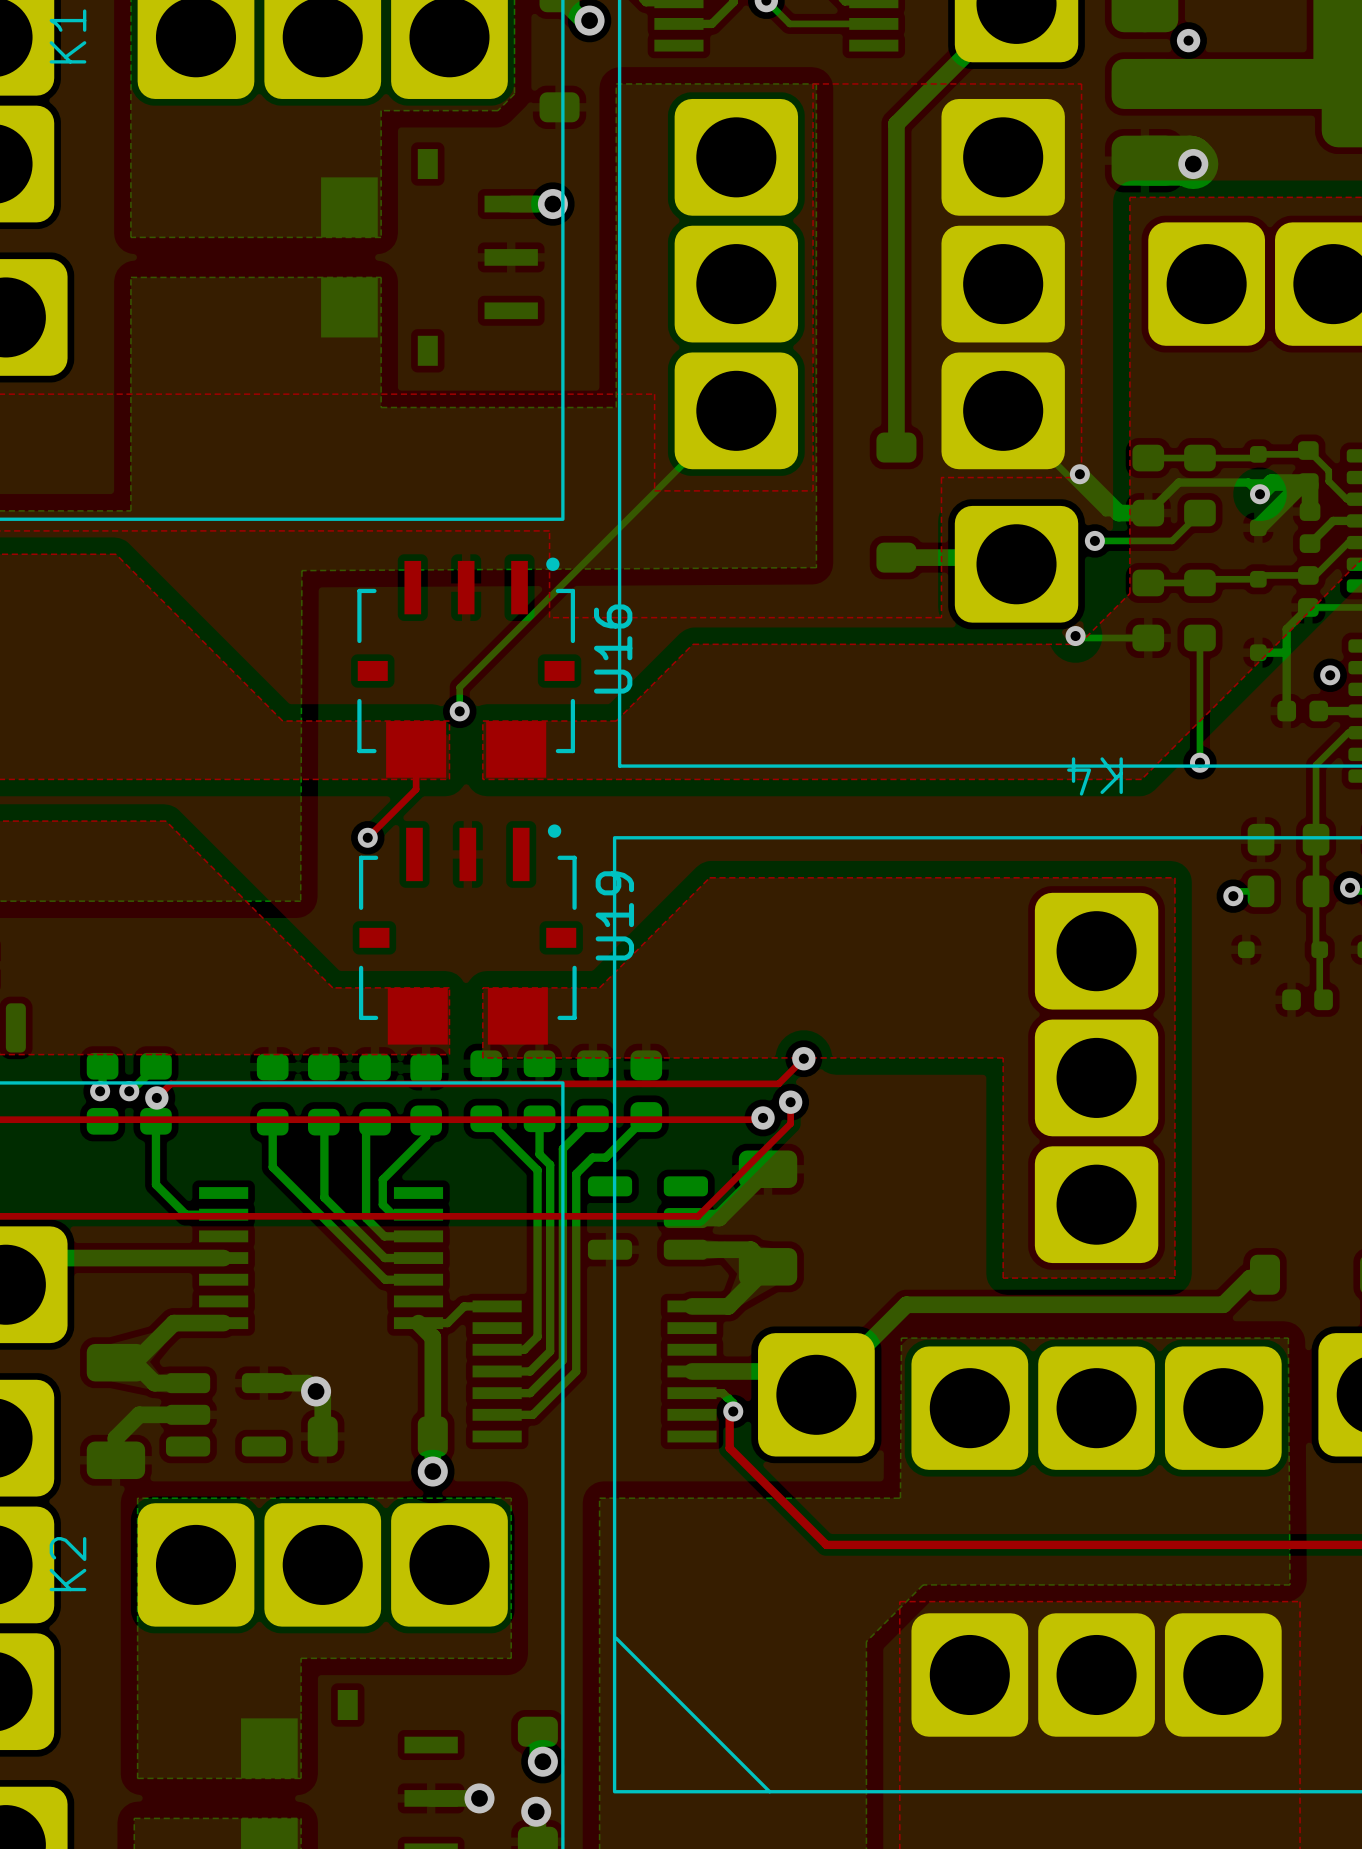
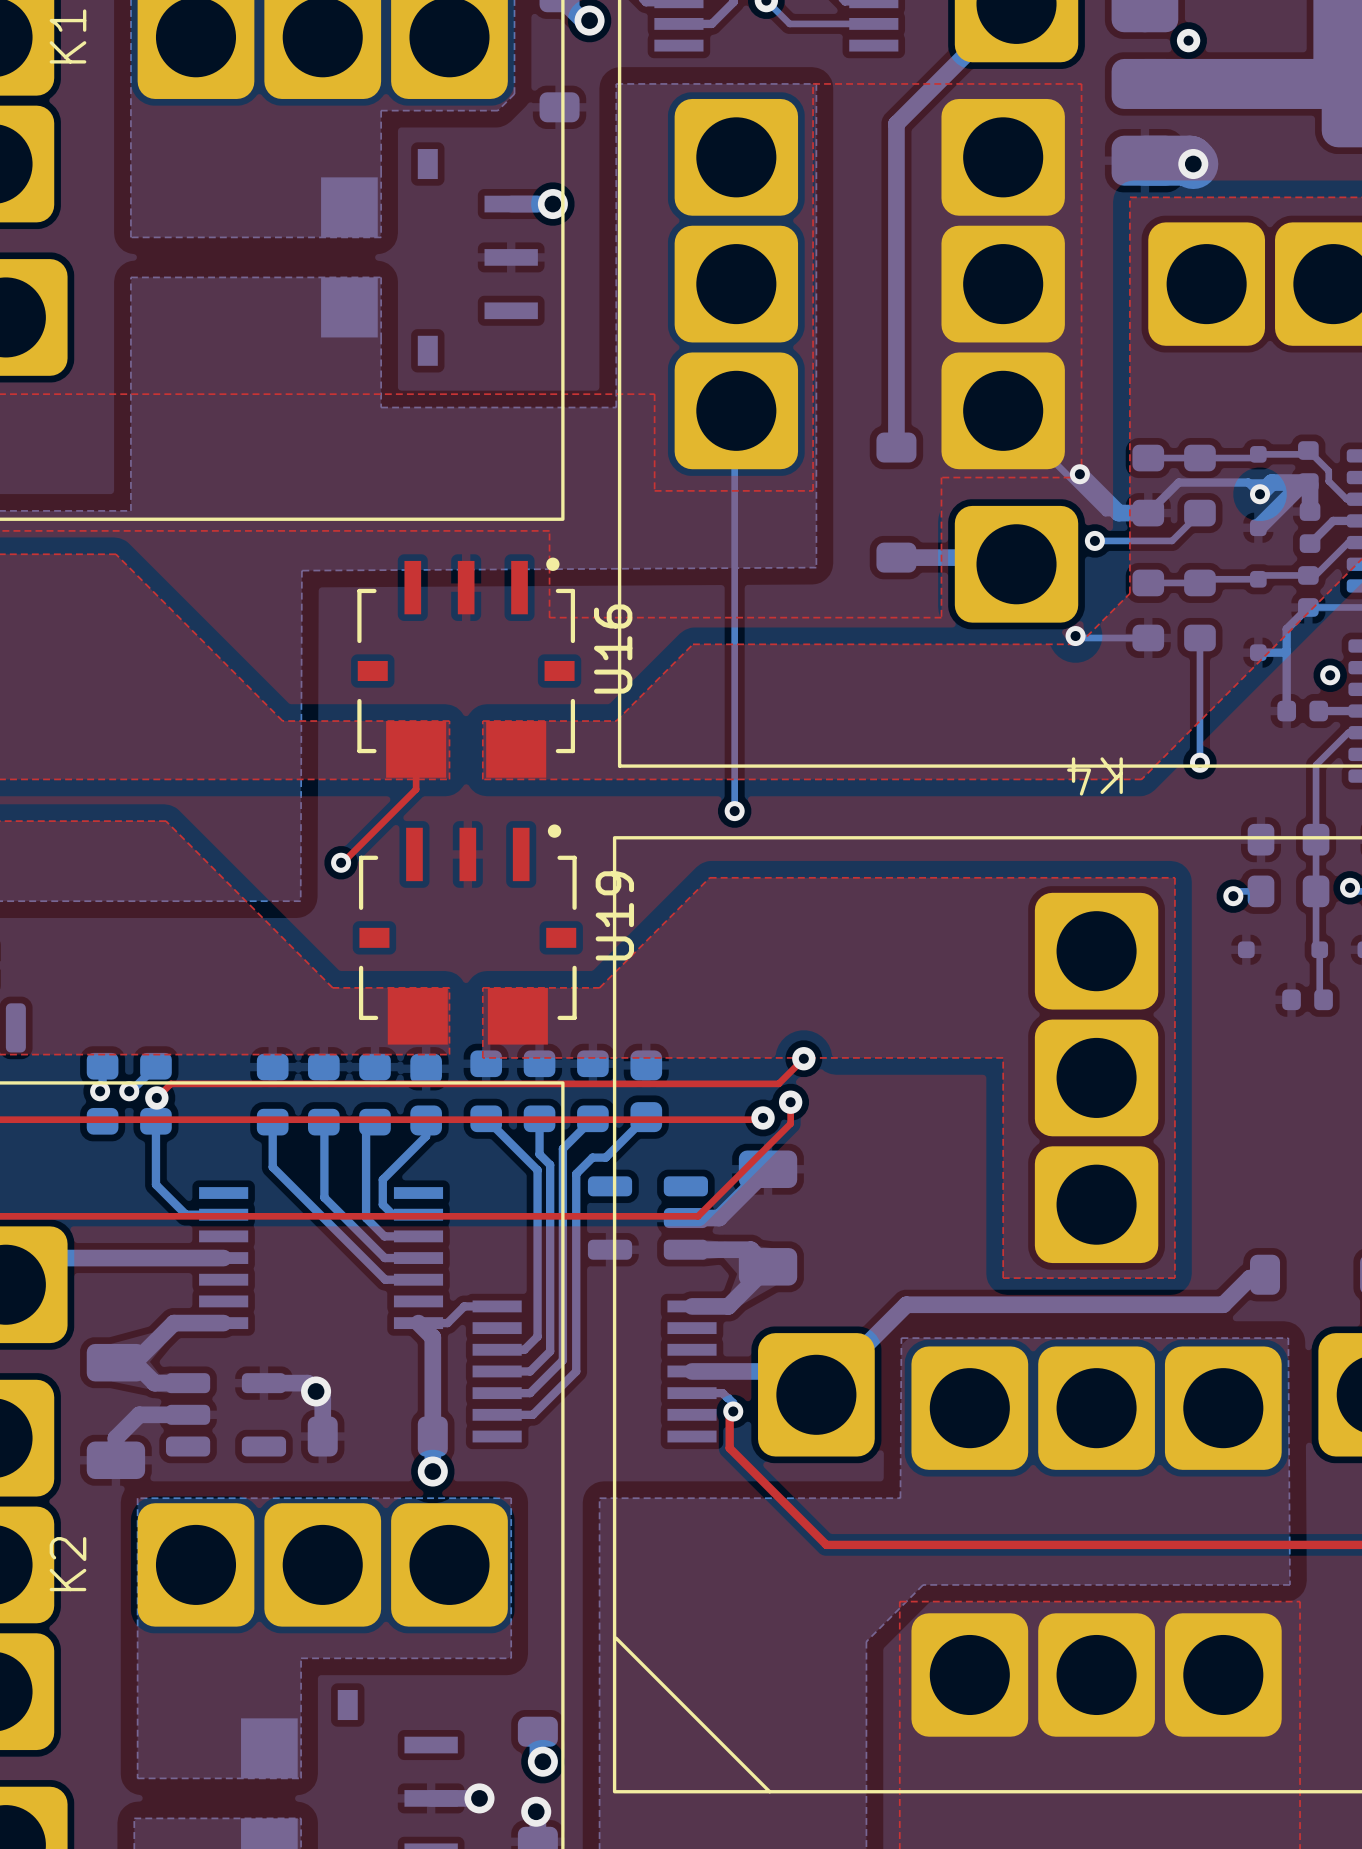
bottom track: (734, 412) (459, 687) (459, 711) -> (734, 412) (734, 811)
via: (459, 711) -> none
via: none -> (734, 811)
top track: none -> (367, 837) (341, 862)
via position: (367, 837) -> (341, 862)

